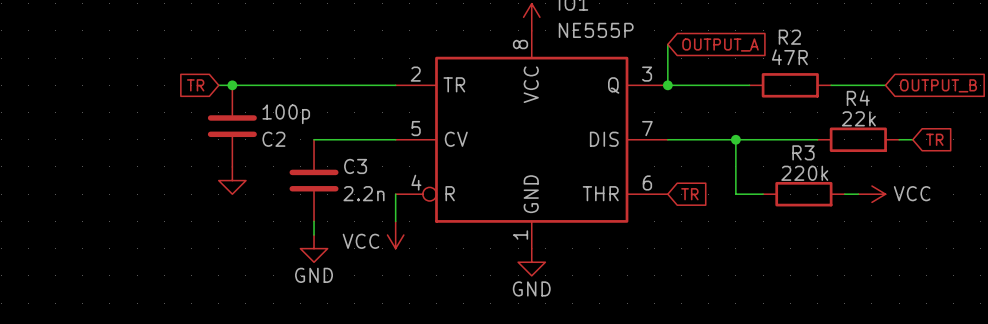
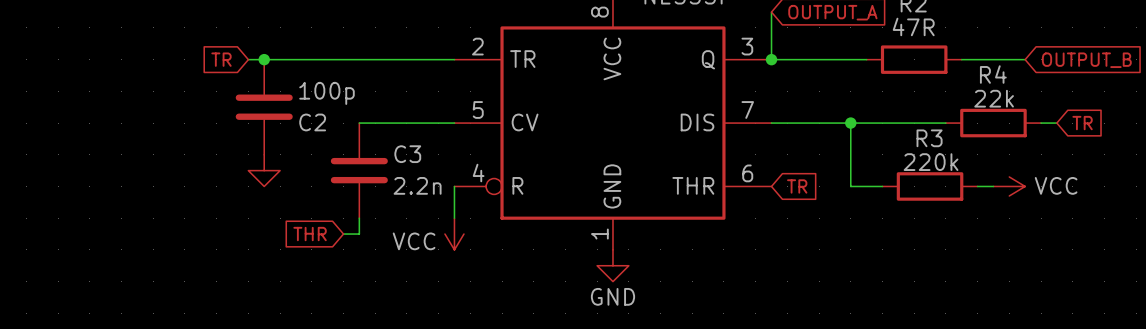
global label: none -> THR (310, 234)
wire: none -> (343, 234) (359, 234)
power symbol: GND (314, 248) -> none

